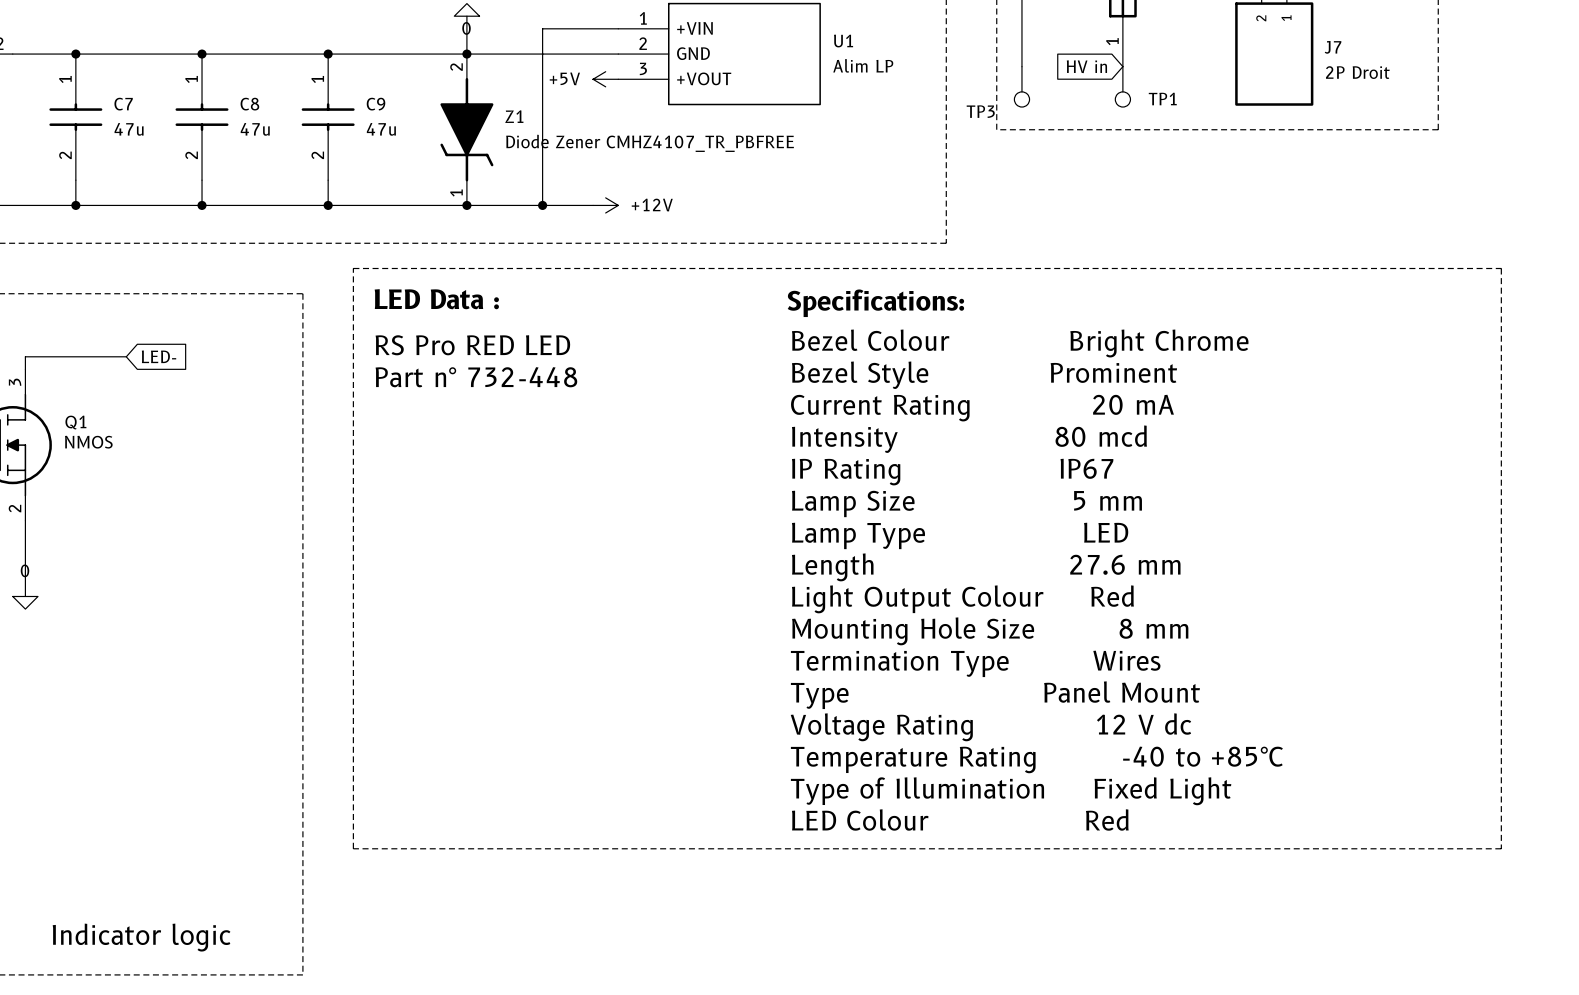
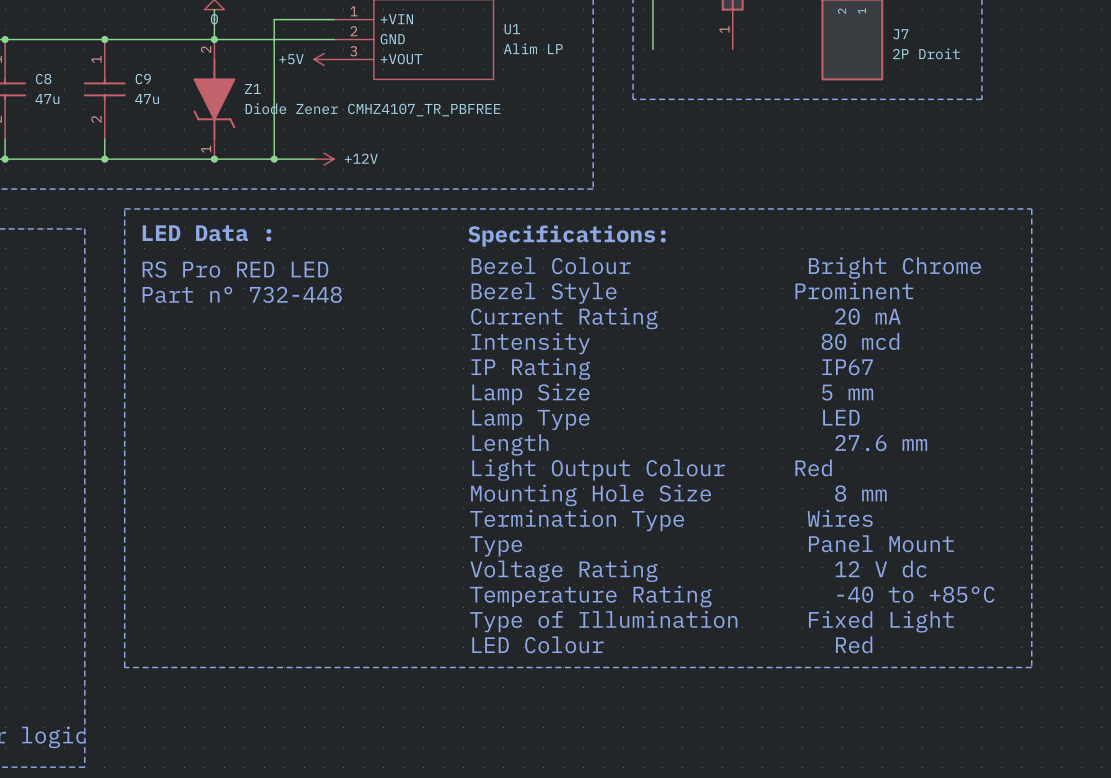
global label: HV in (1086, 66) -> none
TP3: (1021, 86) -> none
TP1: (1122, 86) -> none

